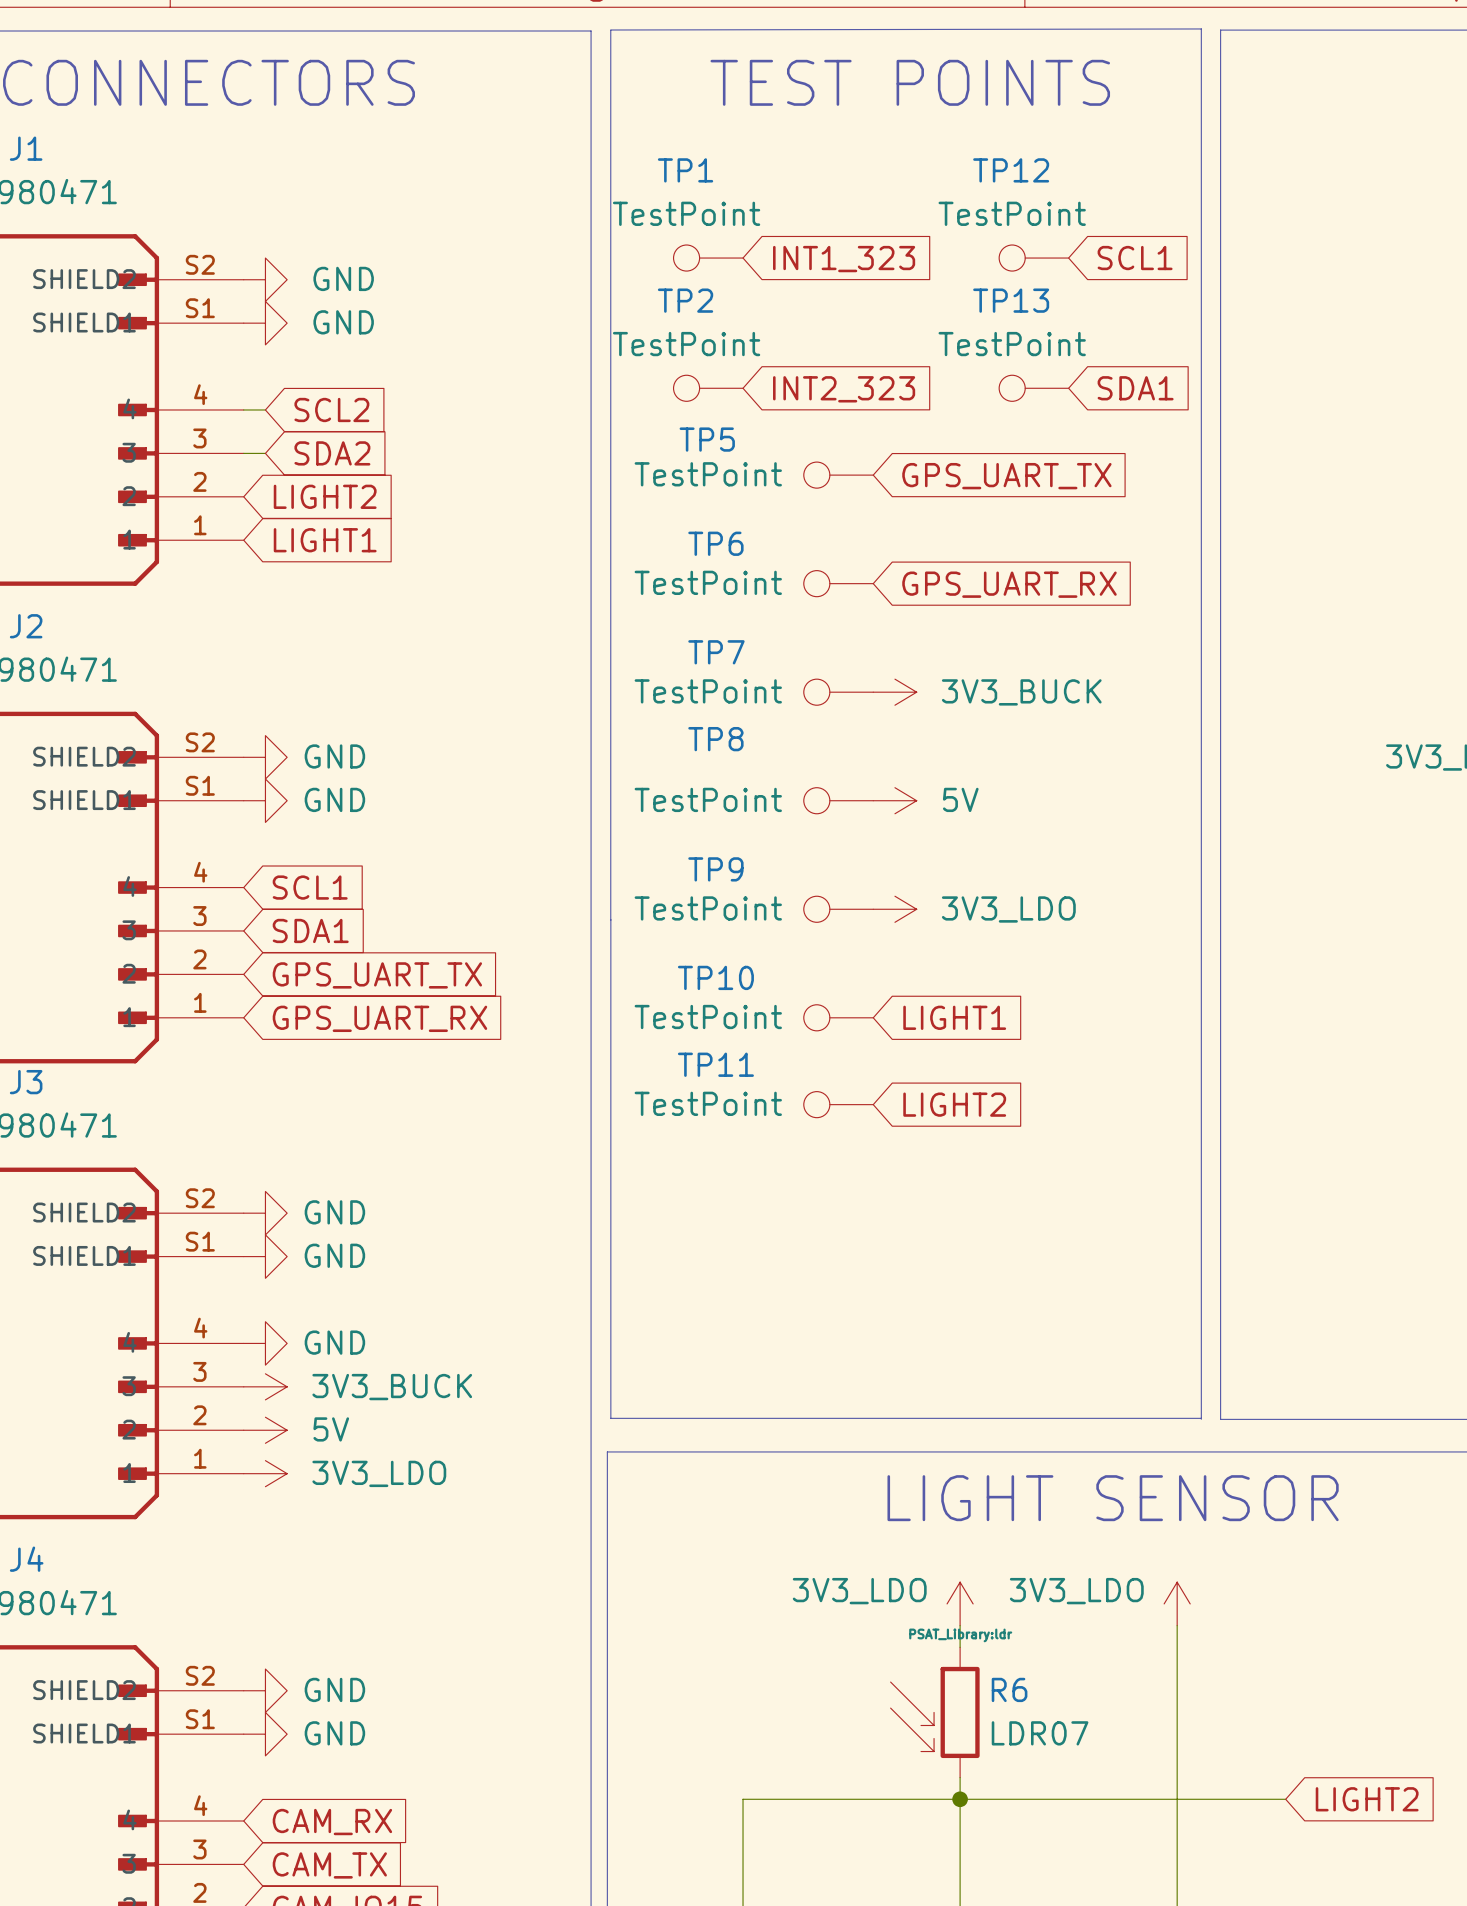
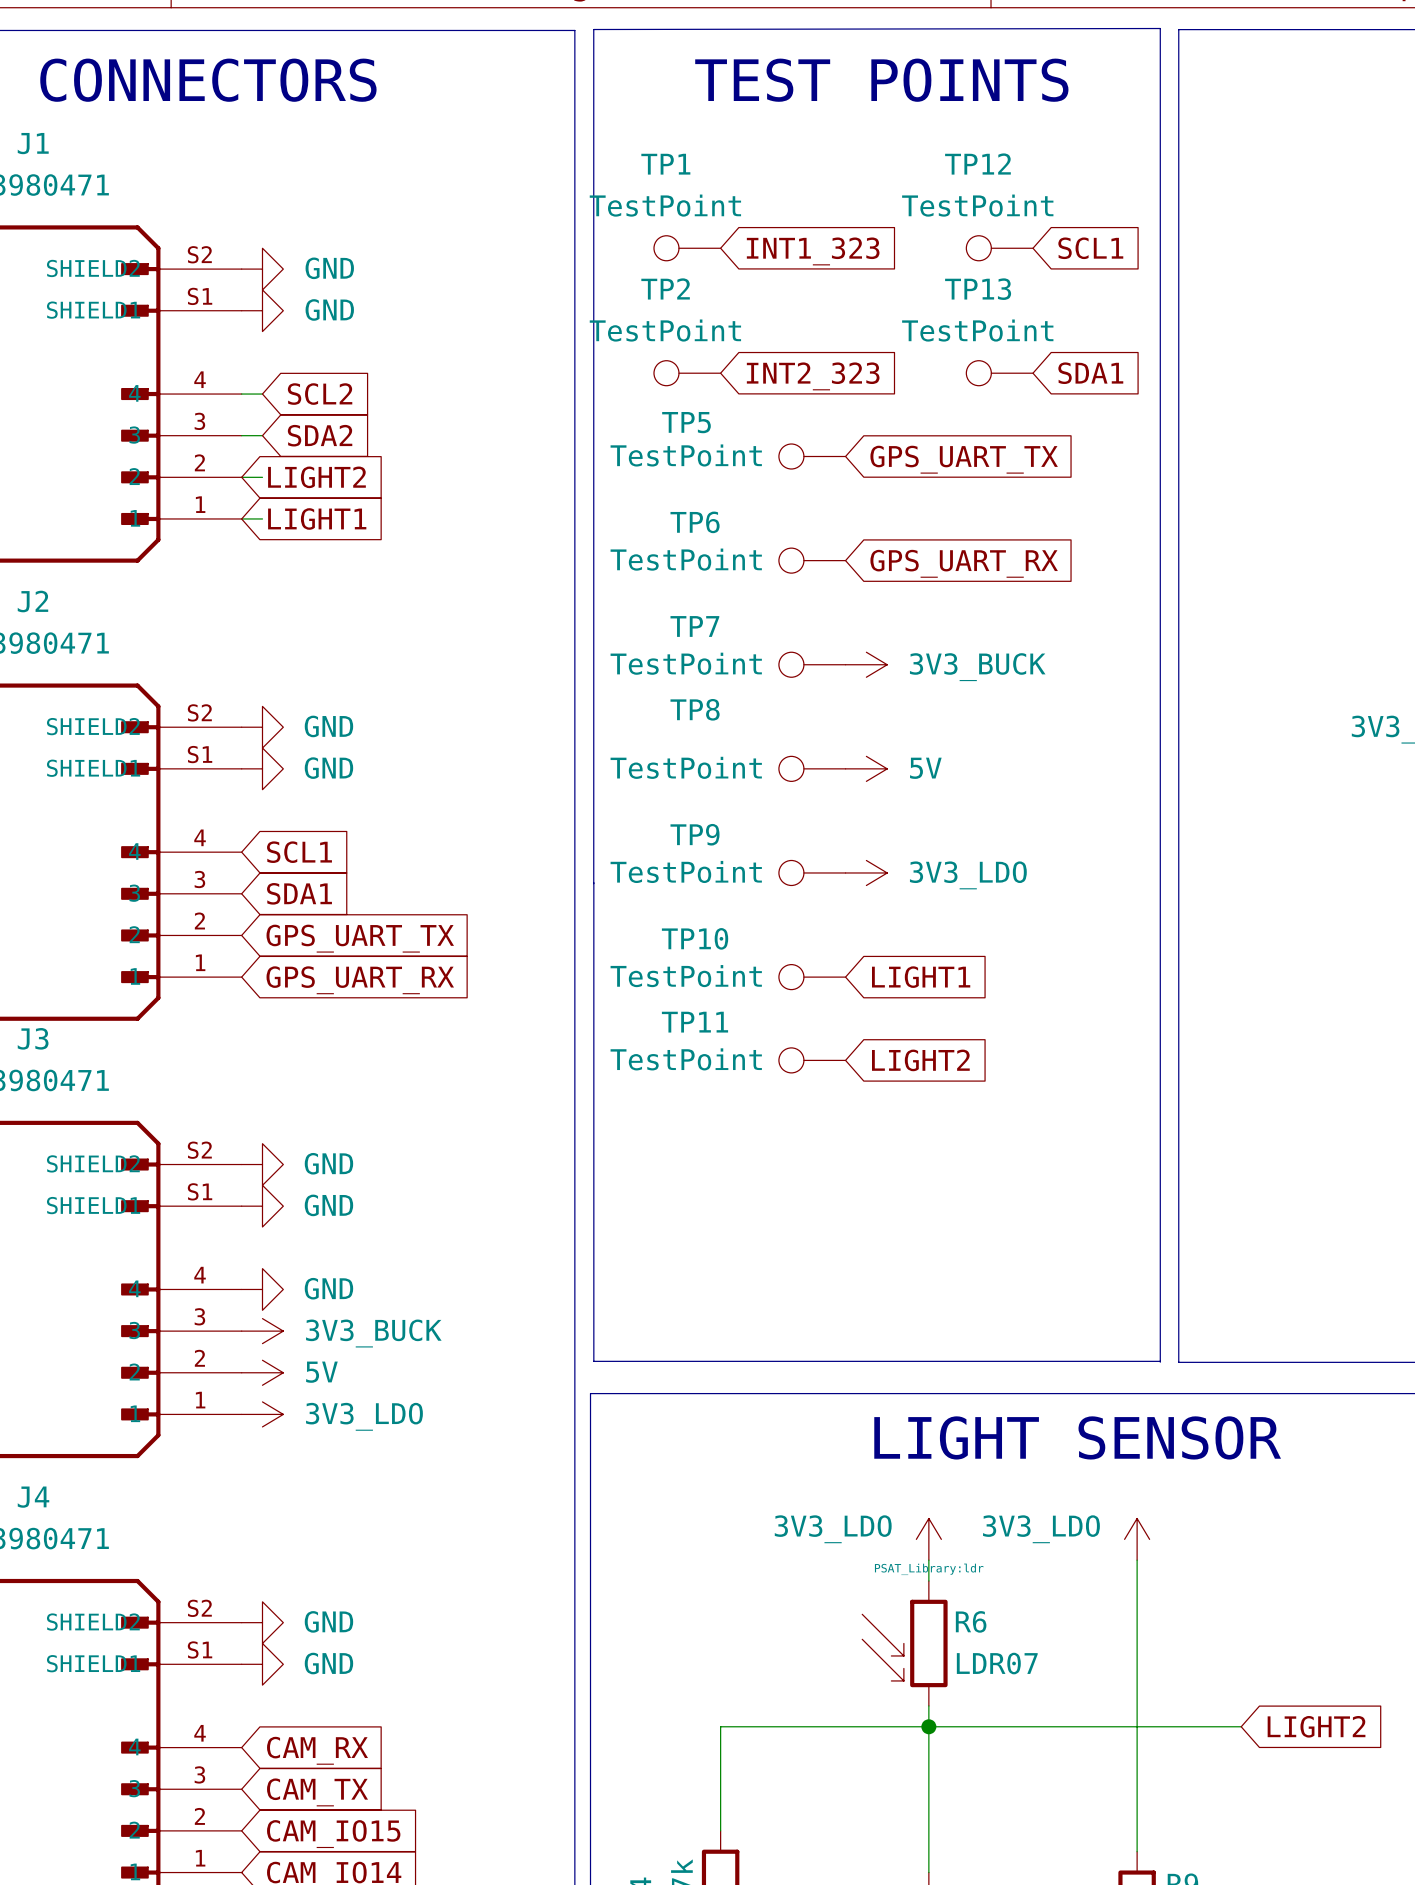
wire: none -> (241, 477) (262, 477)
wire: none -> (241, 518) (262, 518)

